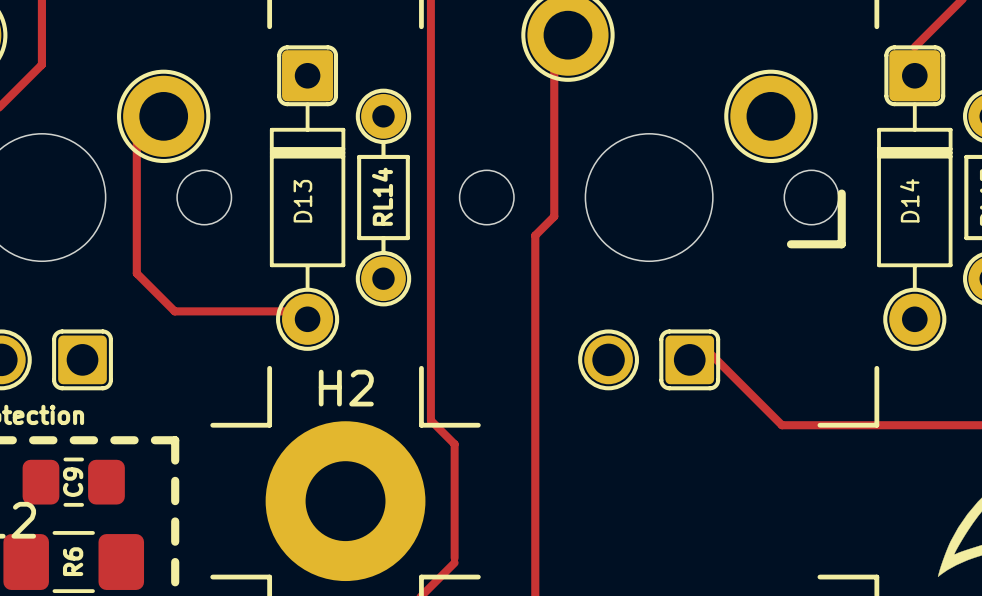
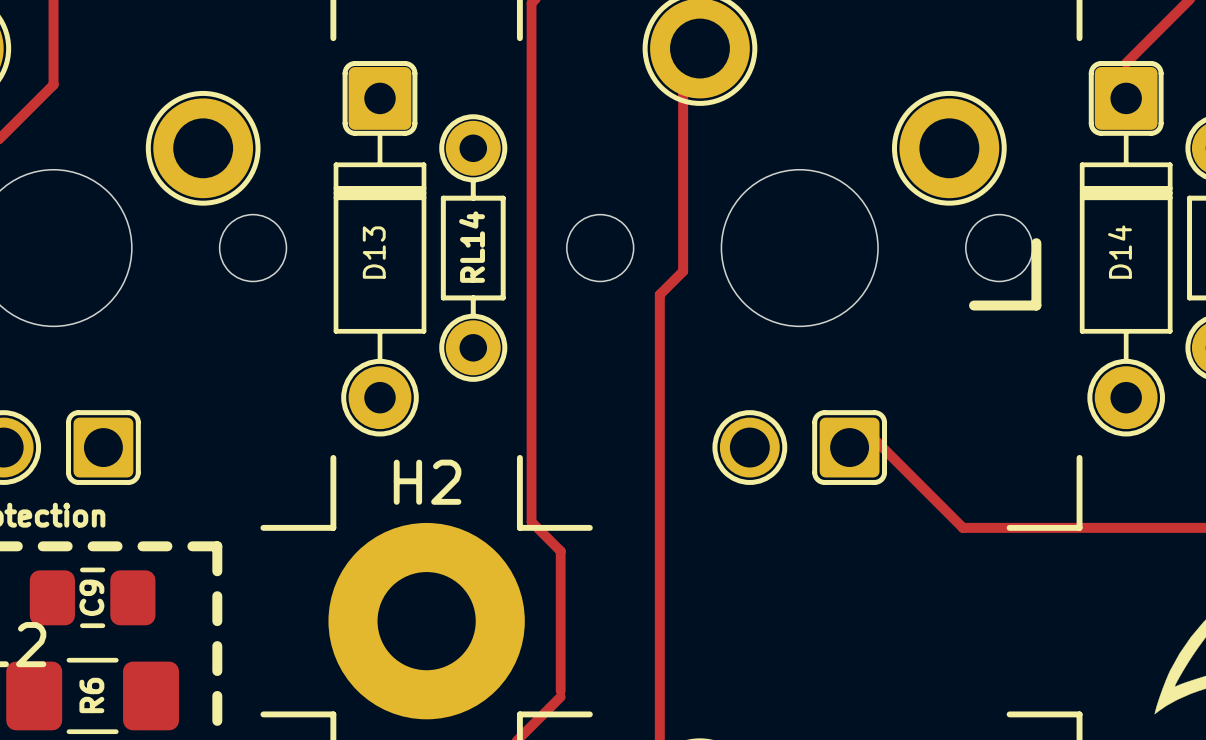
track: (163, 116) (161, 116) (136, 140) (136, 273) (174, 311) (307, 311) -> none

